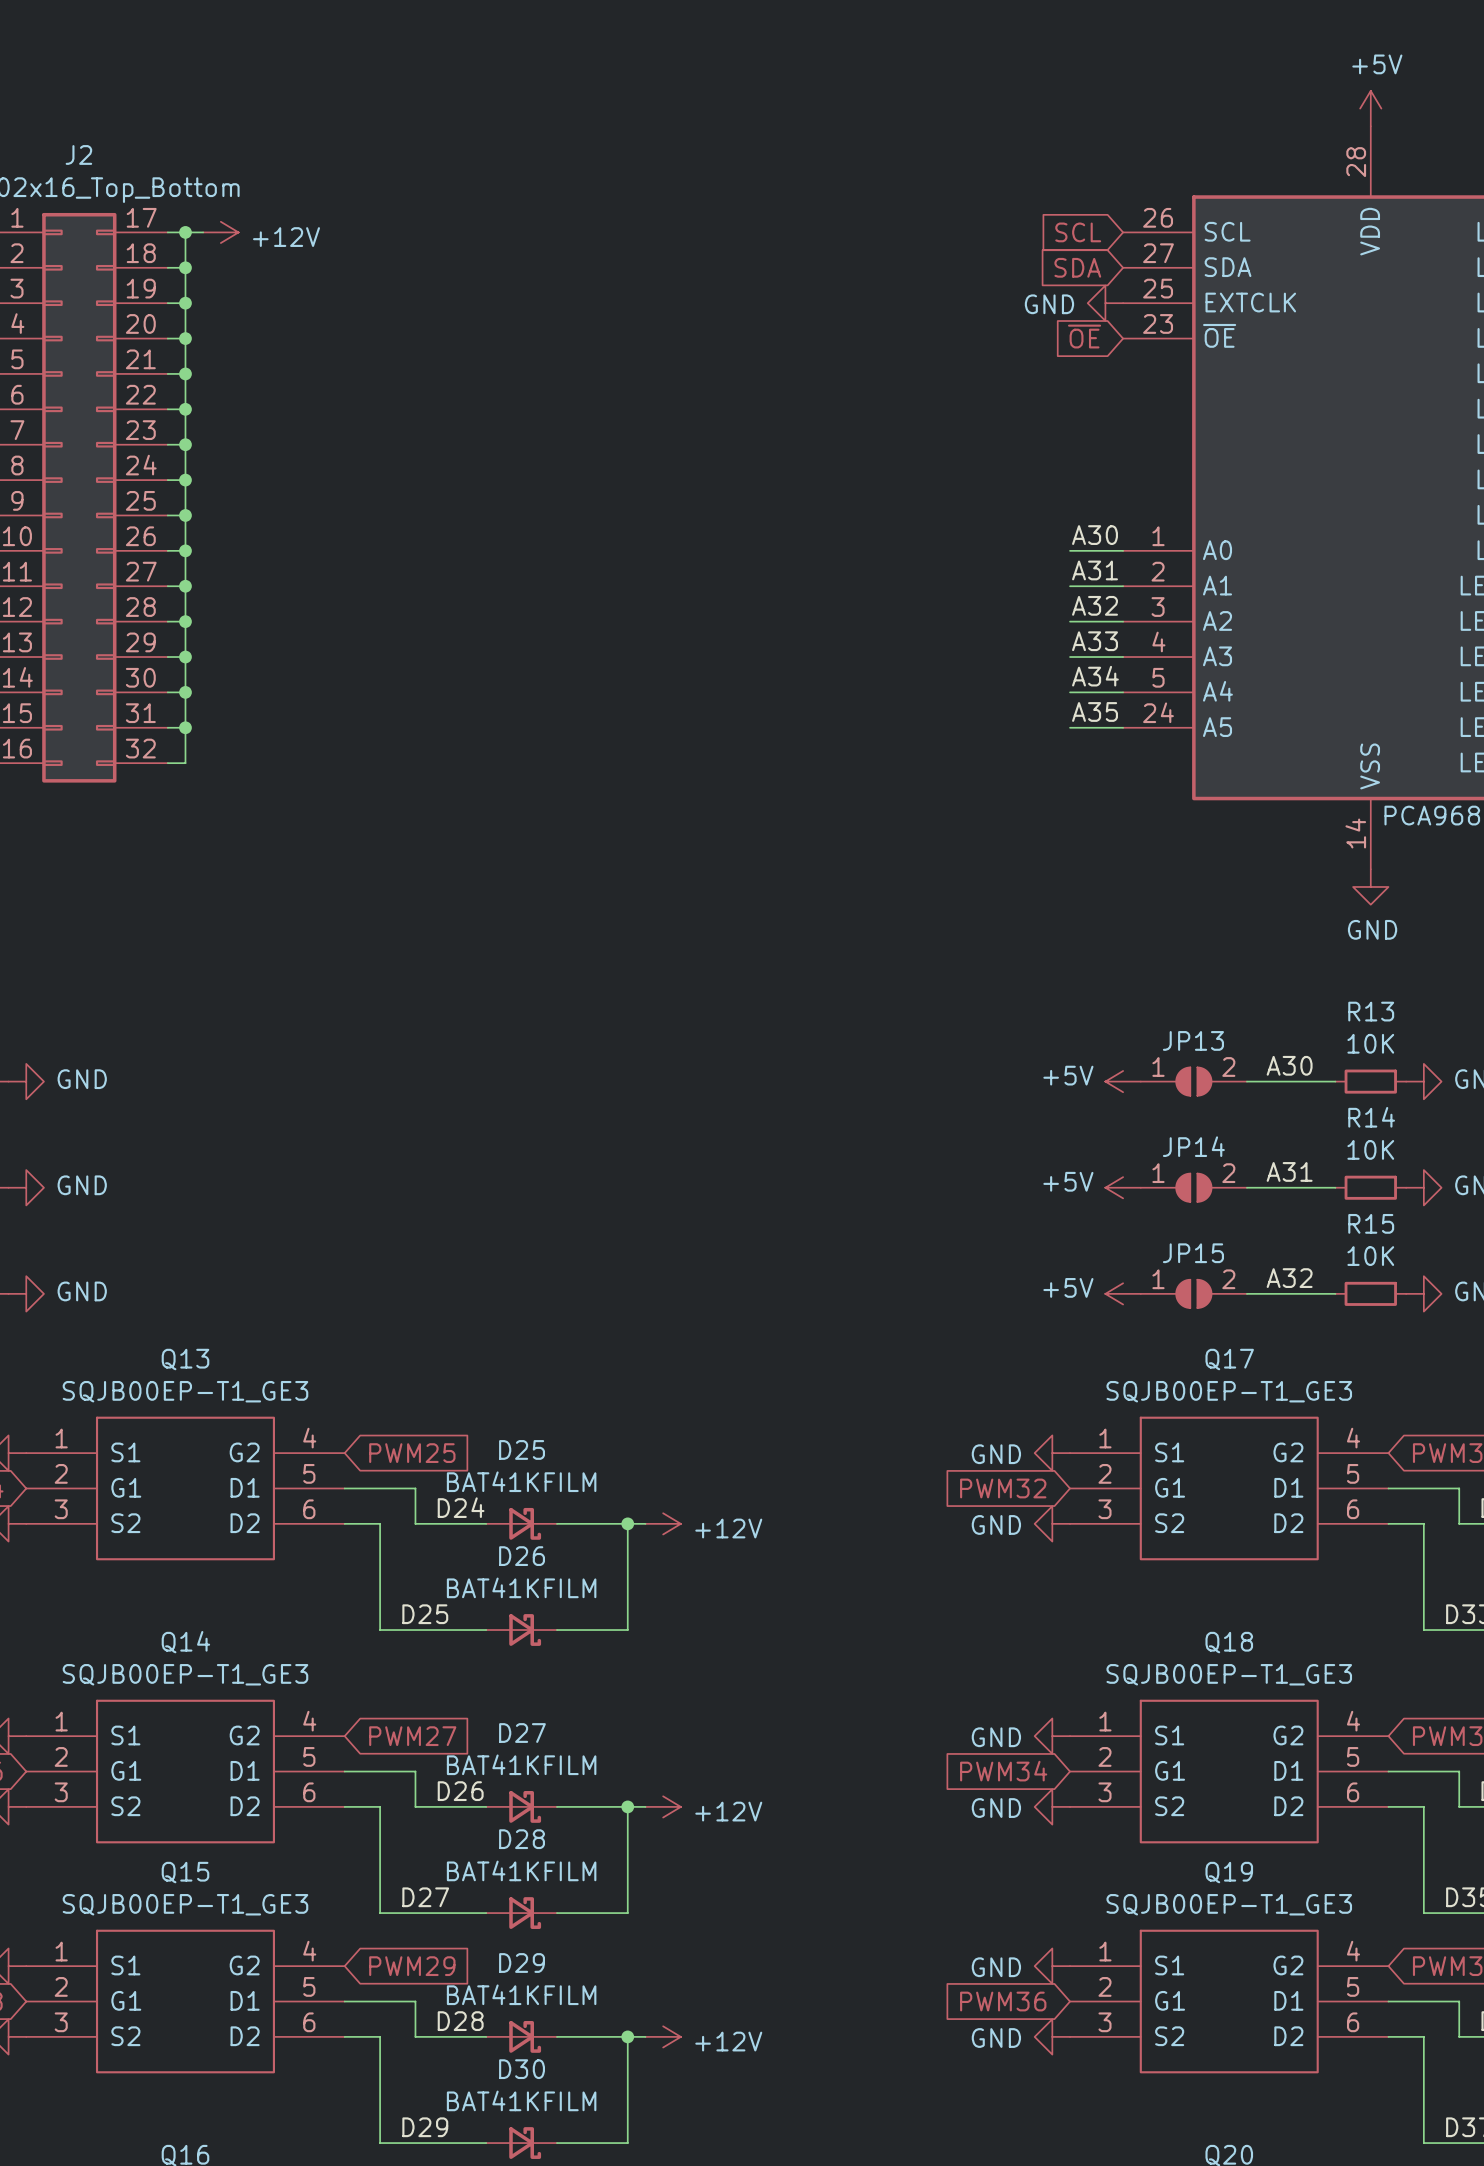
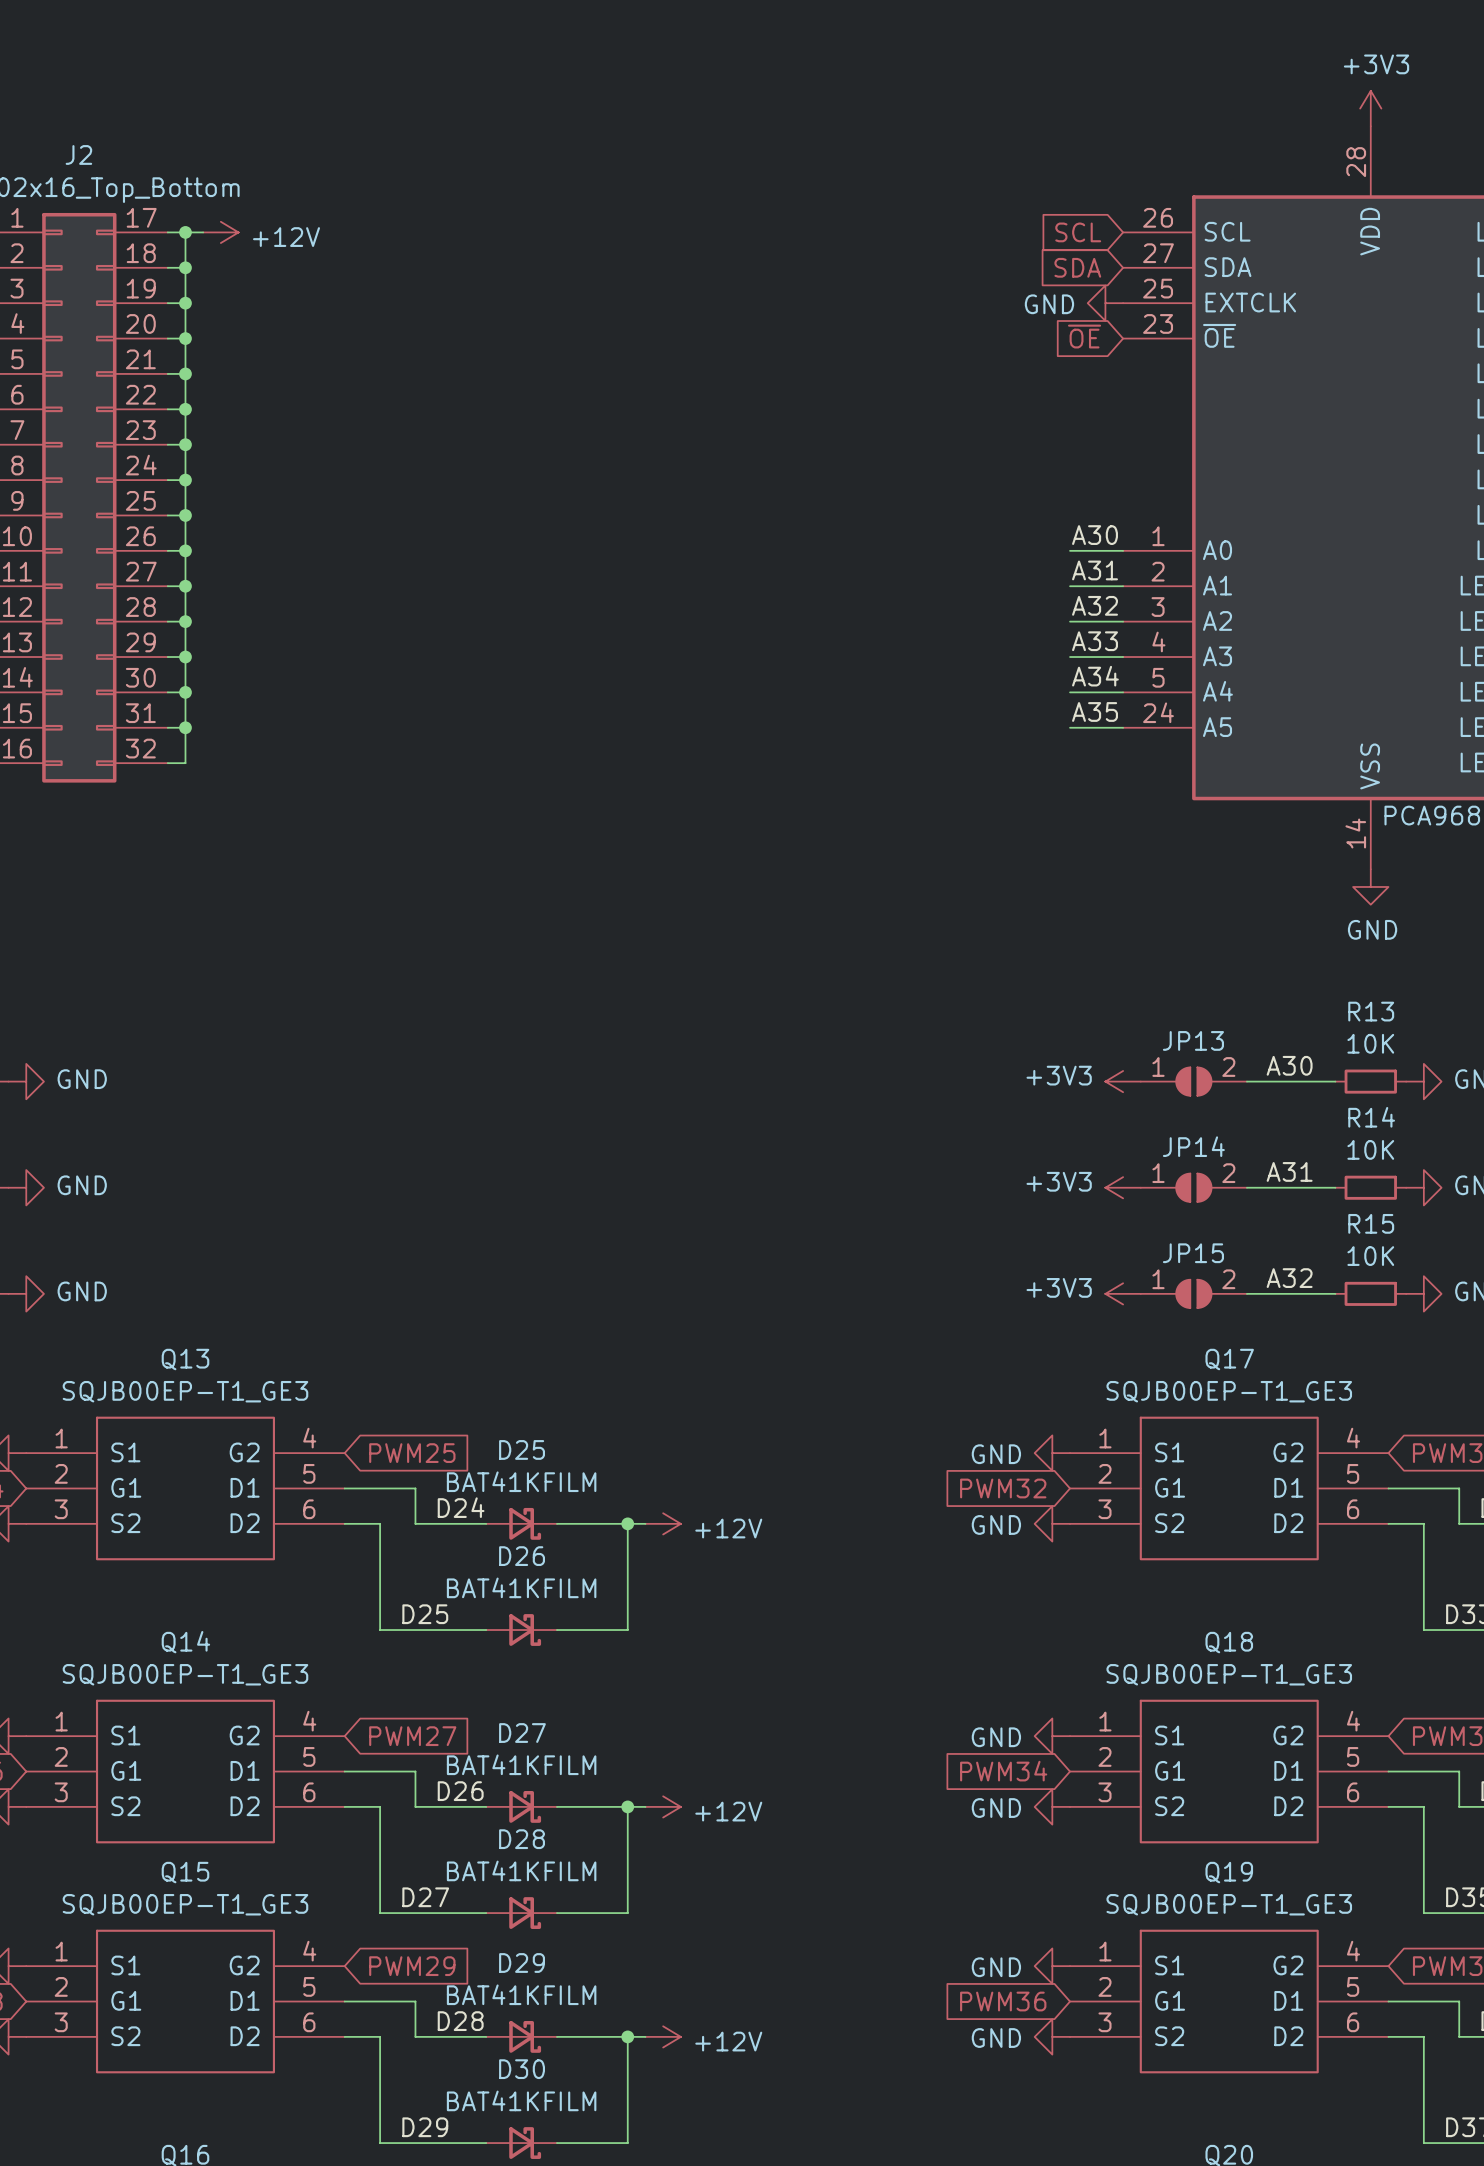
power symbol: +5V (1370, 108) -> +3V3 (1370, 108)
power symbol: +5V (1123, 1081) -> +3V3 (1123, 1081)
power symbol: +5V (1123, 1187) -> +3V3 (1123, 1187)
power symbol: +5V (1123, 1293) -> +3V3 (1123, 1293)

